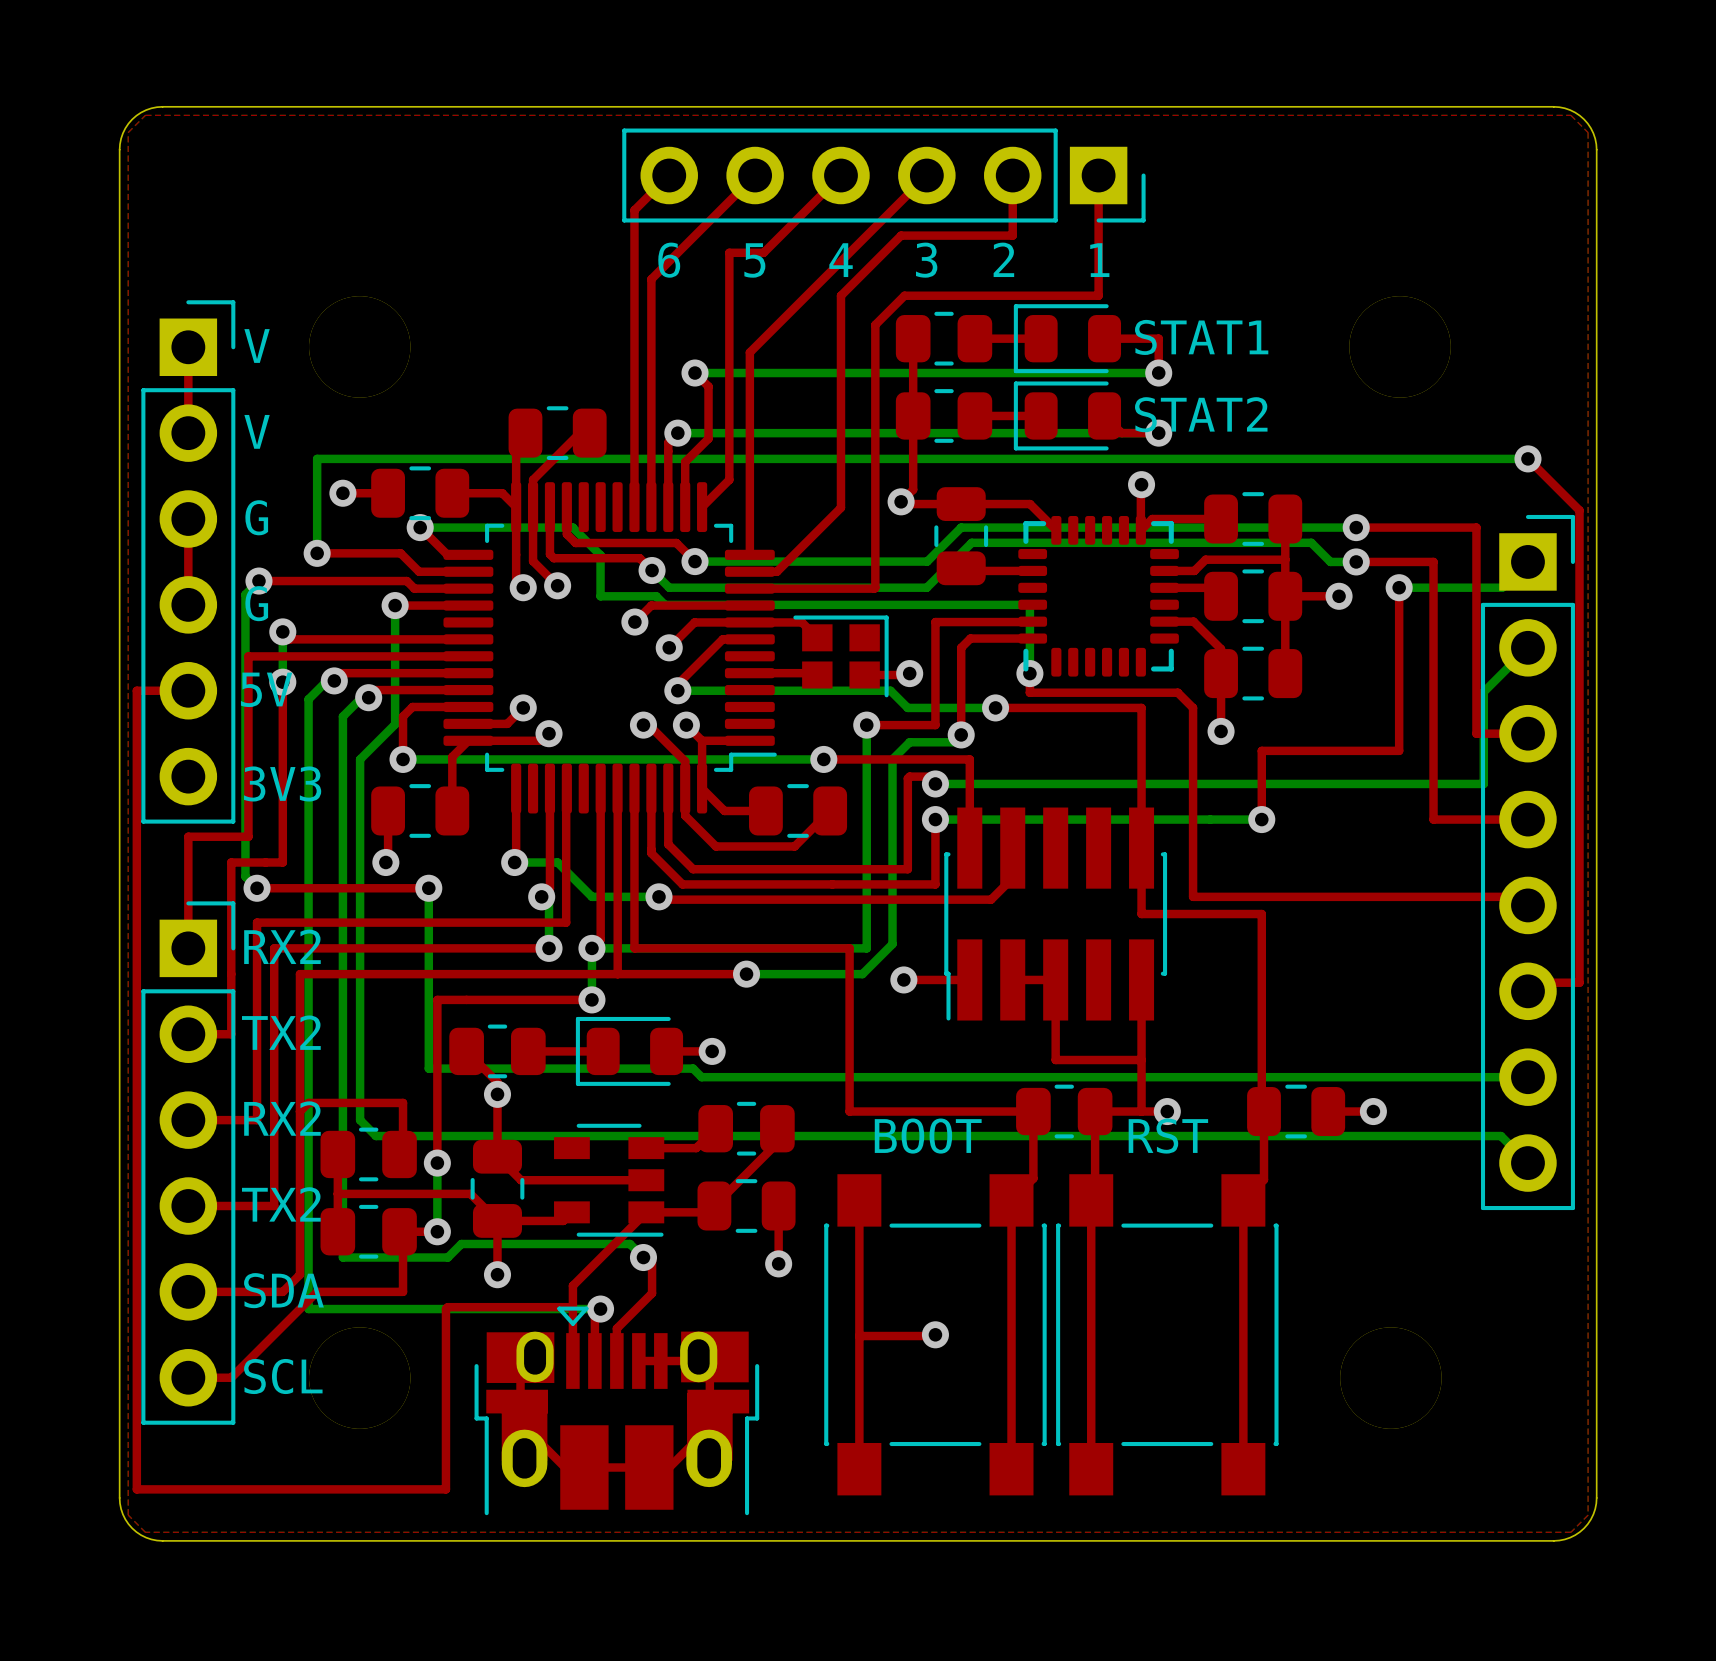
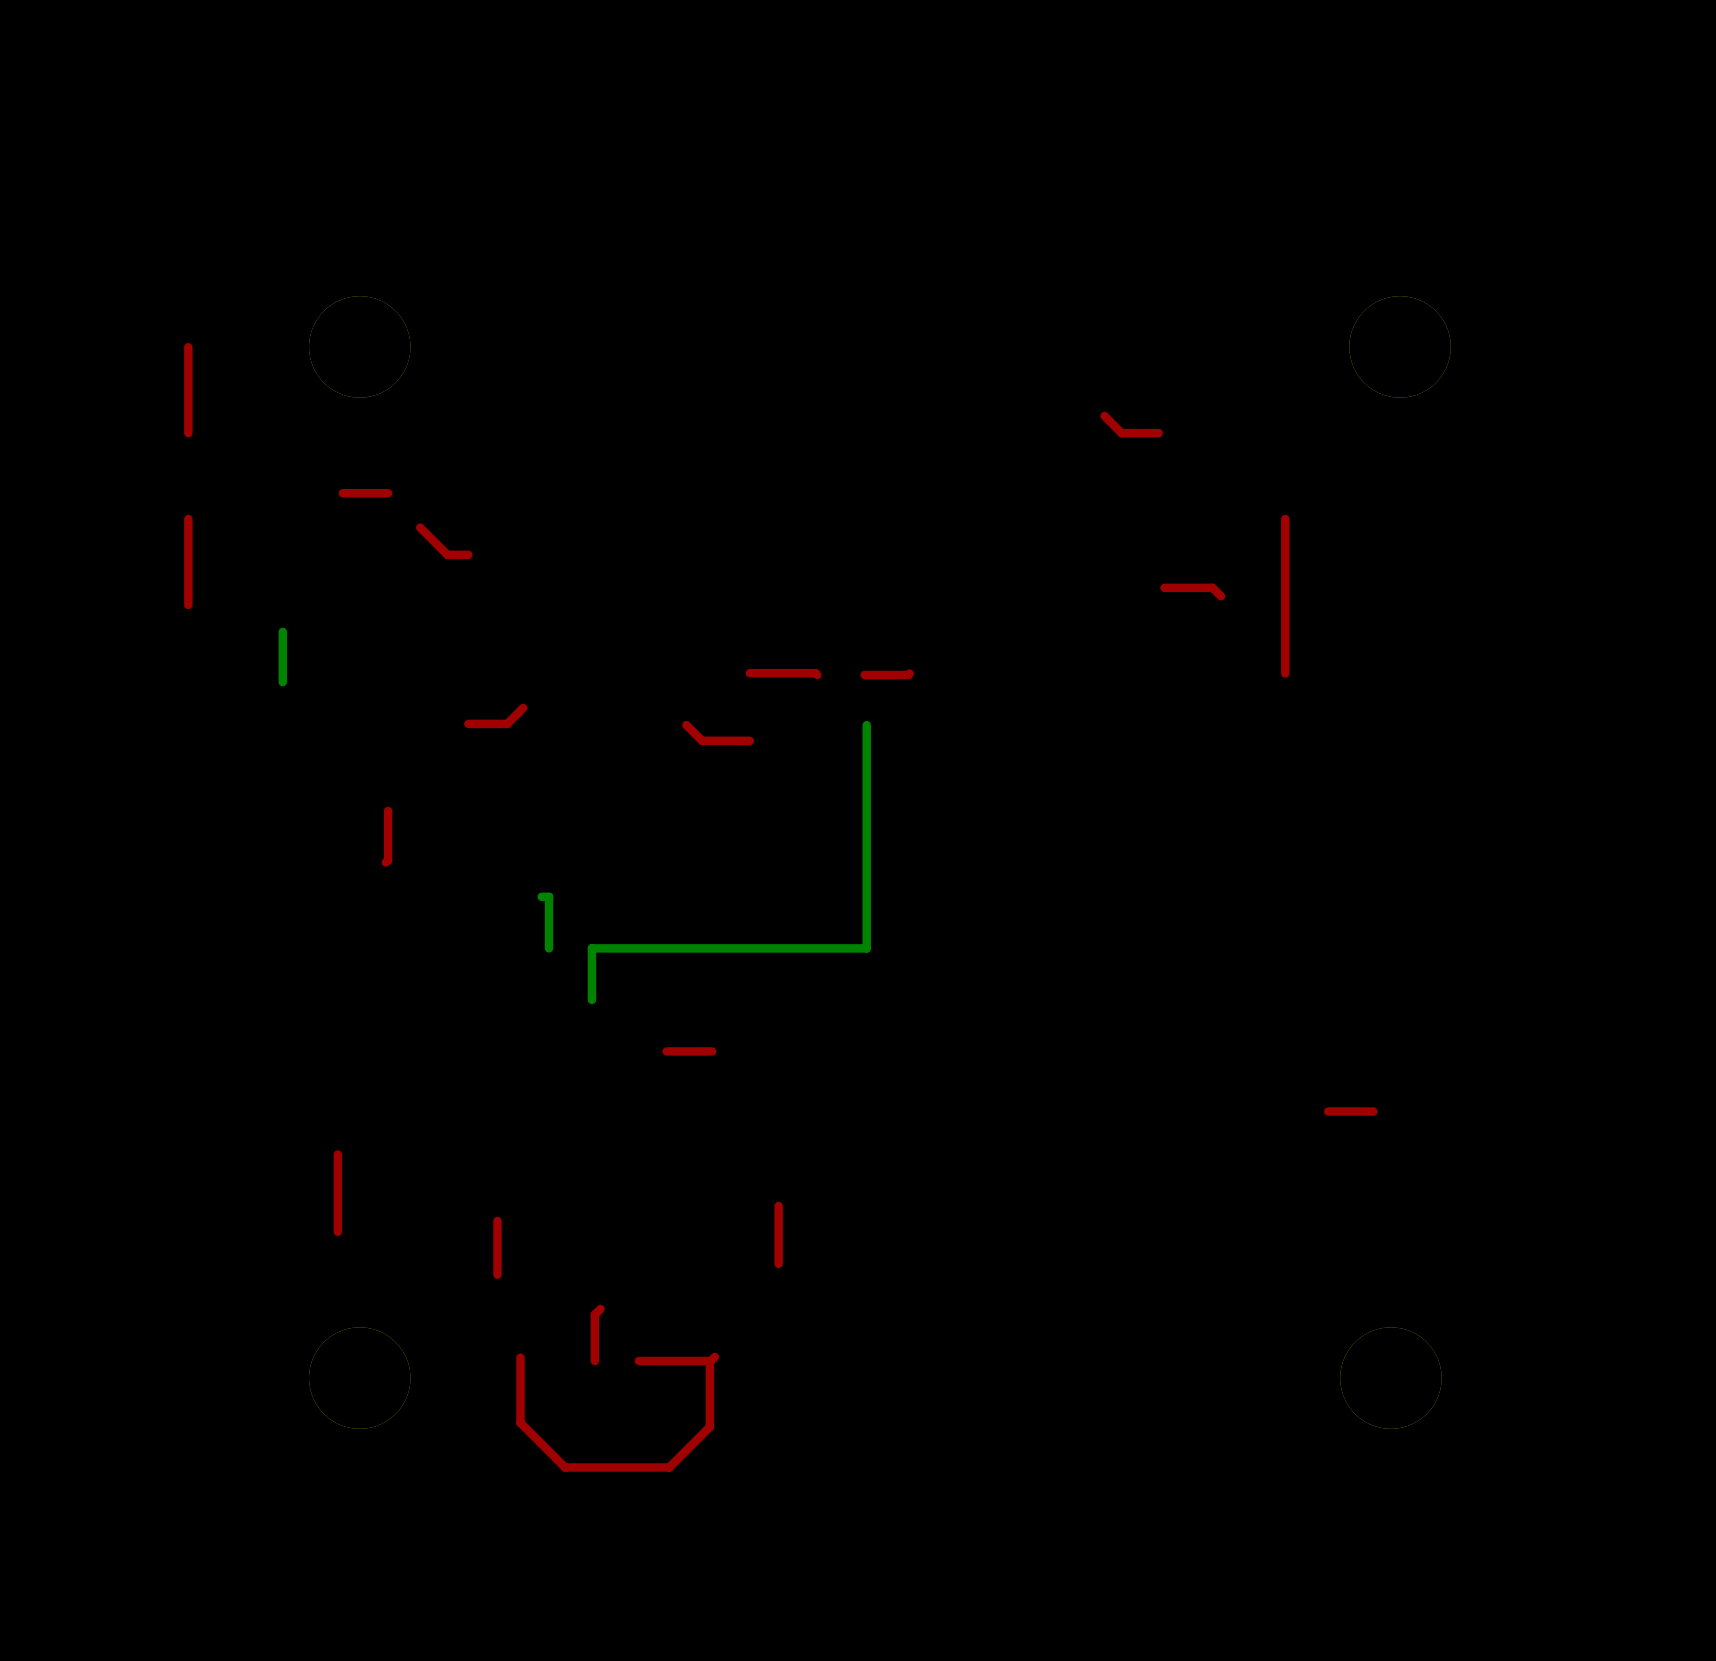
board edge: (162, 106) (1553, 106) (1570, 110) (1584, 119) (1593, 133) (1596, 149) (1596, 1497) (1593, 1514) (1584, 1528) (1570, 1537) (1553, 1540) (162, 1540) (146, 1537) (132, 1528) (122, 1514) (119, 1497) (119, 149) (122, 133) (132, 119) (146, 110) (162, 106) -> none
top zone outline: (145, 115) (128, 132) (128, 1515) (145, 1532) (1570, 1532) (1588, 1515) (1588, 132) (1570, 115) (145, 115) -> none
top track: (669, 175) (634, 210) (634, 507) -> none
top track: (755, 175) (651, 279) (651, 507) -> none
top track: (840, 175) (763, 252) (729, 252) (729, 479) (702, 507) -> none
part: (883, 175) -> none
top track: (926, 175) (749, 352) (749, 554) -> none
top track: (1012, 175) (1012, 235) (901, 235) (840, 295) (840, 507) (777, 571) (749, 571) -> none
top track: (1098, 175) (1098, 295) (904, 295) (875, 324) (875, 587) (749, 588) -> none
text: 2 (1003, 259) -> none
text: 6 (669, 260) -> none
text: 5 (754, 260) -> none
text: 4 (841, 260) -> none
text: 3 (926, 260) -> none
text: 1 (1099, 260) -> none
top track: (913, 338) (913, 489) (901, 501) (903, 504) (1030, 504) (1056, 530) -> none
part: (944, 338) -> none
top track: (974, 338) (1041, 338) -> none
part: STAT1 (1067, 338) -> none
top track: (1104, 338) (1158, 338) (1158, 373) -> none
text: V (257, 345) -> none
top track: (695, 373) (708, 386) (708, 438) (685, 462) (685, 507) -> none
bottom track: (695, 373) (1158, 373) -> none
via: (695, 373) -> none
via: (1158, 373) -> none
part: (944, 415) -> none
top track: (974, 415) (1041, 415) -> none
part: STAT2 (1067, 415) -> none
text: V (257, 431) -> none
top track: (525, 433) (516, 442) (516, 580) (523, 587) -> none
part: (557, 433) -> none
top track: (589, 433) (579, 433) (533, 479) (533, 561) (557, 585) -> none
top track: (677, 433) (668, 442) (668, 507) -> none
bottom track: (677, 433) (1158, 433) -> none
via: (677, 433) -> none
via: (1158, 433) -> none
top track: (1527, 458) (1579, 510) (1579, 982) (1536, 982) (1527, 991) -> none
bottom track: (1527, 458) (317, 458) (317, 553) -> none
via: (1527, 458) -> none
top track: (1141, 484) (1140, 530) (1152, 519) (1221, 519) -> none
via: (1141, 484) -> none
via: (342, 493) -> none
part: (420, 493) -> none
top track: (452, 493) (502, 493) (516, 507) -> none
via: (901, 501) -> none
top track: (549, 507) (549, 554) (553, 558) (639, 558) (652, 570) -> none
top track: (566, 507) (566, 534) (575, 543) (676, 543) (695, 561) -> none
text: G (256, 517) -> none
part: (1253, 519) -> none
bottom track: (420, 527) (572, 527) (600, 555) (600, 596) (656, 596) (664, 604) (1029, 604) (1029, 673) -> none
via: (420, 527) -> none
top track: (1356, 527) (1476, 527) (1476, 733) (1527, 733) -> none
bottom track: (1356, 527) (961, 527) (927, 561) (695, 561) -> none
via: (1356, 527) -> none
part: (961, 536) -> none
top track: (317, 553) (400, 553) (419, 571) (468, 571) -> none
via: (317, 553) -> none
top track: (1285, 559) (1205, 559) (1194, 570) (1164, 570) -> none
part: (188, 561) -> none
via: (695, 561) -> none
top track: (1356, 561) (1433, 561) (1433, 819) (1527, 819) -> none
bottom track: (1356, 561) (1330, 561) (1311, 542) (971, 542) (926, 587) (669, 587) (652, 570) -> none
via: (1356, 561) -> none
bottom track: (1527, 561) (1502, 587) (1399, 587) -> none
top track: (961, 568) (963, 570) (1032, 570) -> none
via: (652, 570) -> none
top track: (258, 581) (406, 581) (414, 588) (468, 588) -> none
bottom track: (258, 581) (245, 594) (245, 876) (257, 888) -> none
via: (258, 581) -> none
via: (557, 585) -> none
via: (523, 587) -> none
top track: (1399, 587) (1399, 750) (1261, 750) (1261, 819) -> none
via: (1399, 587) -> none
part: (1098, 596) -> none
part: (1253, 596) -> none
top track: (1285, 596) (1339, 596) -> none
via: (1339, 596) -> none
text: G (256, 603) -> none
top track: (395, 605) (468, 605) -> none
bottom track: (395, 605) (395, 724) (360, 759) (360, 1120) (376, 1136) (1500, 1136) (1527, 1163) -> none
via: (395, 605) -> none
top track: (749, 605) (651, 605) (634, 622) -> none
top track: (1164, 621) (1193, 621) (1221, 649) (1221, 731) -> none
via: (634, 622) -> none
top track: (1032, 622) (935, 622) (935, 725) (866, 725) -> none
top track: (282, 631) (290, 639) (468, 639) -> none
via: (282, 631) -> none
top track: (817, 637) (801, 622) (694, 622) (669, 647) -> none
top track: (1032, 638) (970, 638) (961, 647) (961, 734) -> none
top track: (749, 639) (722, 639) (677, 684) (677, 690) -> none
part: (610, 647) -> none
via: (669, 647) -> none
bottom track: (1527, 647) (1483, 692) (1483, 783) (935, 783) -> none
top track: (468, 656) (248, 656) (248, 836) (188, 836) (188, 948) -> none
part: (840, 656) -> none
top track: (468, 673) (342, 673) (334, 680) -> none
via: (909, 673) -> none
top track: (1029, 673) (1029, 692) (1177, 692) (1193, 707) (1193, 896) (1519, 896) (1527, 905) -> none
via: (1029, 673) -> none
part: (1253, 673) -> none
bottom track: (334, 680) (334, 673) (308, 699) (308, 1309) (600, 1309) -> none
via: (334, 680) -> none
top track: (282, 682) (282, 862) (231, 862) (231, 1034) (188, 1034) -> none
via: (282, 682) -> none
text: 5V (266, 689) -> none
top track: (188, 690) (136, 690) (136, 1489) (445, 1489) (445, 1309) (447, 1307) (572, 1307) -> none
top track: (468, 690) (376, 690) (368, 697) -> none
bottom track: (677, 690) (890, 690) (907, 707) (995, 707) -> none
via: (677, 690) -> none
bottom track: (368, 697) (368, 690) (342, 716) (342, 1257) (447, 1257) (461, 1244) (629, 1244) (643, 1257) -> none
via: (368, 697) -> none
top track: (468, 706) (412, 706) (403, 716) (403, 759) -> none
via: (523, 707) -> none
top track: (995, 707) (1141, 707) (1141, 914) (1261, 914) (1261, 1109) (1264, 1111) (1264, 1179) (1243, 1200) (1243, 1469) -> none
via: (995, 707) -> none
top track: (643, 725) (648, 725) (685, 761) (685, 815) (715, 846) (794, 846) (830, 810) -> none
via: (643, 725) -> none
via: (686, 725) -> none
via: (866, 725) -> none
via: (1221, 731) -> none
top track: (549, 733) (541, 740) (468, 740) (452, 756) (452, 810) -> none
via: (549, 733) -> none
bottom track: (961, 734) (961, 742) (909, 742) (892, 759) (892, 944) (862, 974) (746, 974) -> none
via: (961, 734) -> none
top track: (702, 740) (702, 788) (724, 810) (765, 810) -> none
bottom track: (403, 759) (823, 759) -> none
via: (403, 759) -> none
top track: (823, 759) (969, 759) (969, 848) -> none
via: (823, 759) -> none
text: 3V3 (282, 783) -> none
top track: (935, 783) (935, 776) (909, 776) (907, 778) (907, 869) (693, 869) (668, 844) (668, 788) -> none
via: (935, 783) -> none
top track: (516, 788) (514, 862) -> none
top track: (549, 788) (549, 888) (541, 896) -> none
top track: (566, 788) (566, 922) (257, 922) (257, 1120) (188, 1120) -> none
top track: (600, 788) (600, 939) (591, 948) -> none
top track: (617, 788) (617, 974) -> none
top track: (634, 788) (634, 947) -> none
top track: (651, 788) (651, 853) (682, 884) (935, 884) (935, 819) -> none
part: (420, 810) -> none
part: (798, 810) -> none
bottom track: (935, 819) (1261, 819) -> none
via: (935, 819) -> none
via: (1261, 819) -> none
top track: (1012, 848) (1012, 878) (991, 899) (661, 899) (658, 896) -> none
via: (385, 862) -> none
bottom track: (514, 862) (557, 862) (591, 896) (658, 896) -> none
via: (514, 862) -> none
part: (1527, 862) -> none
top track: (257, 888) (428, 888) -> none
via: (257, 888) -> none
bottom track: (428, 888) (428, 1068) (693, 1068) (701, 1077) (1527, 1077) -> none
via: (428, 888) -> none
via: (541, 896) -> none
via: (658, 896) -> none
part: (1055, 914) -> none
text: RX2 (282, 946) -> none
top track: (549, 948) (274, 948) (274, 1206) (188, 1206) -> none
via: (549, 948) -> none
via: (591, 948) -> none
top track: (634, 948) (849, 948) (849, 1111) (1033, 1111) (1033, 1178) (1011, 1200) (1011, 1469) -> none
top track: (746, 974) (299, 974) (299, 1274) (282, 1291) (188, 1291) -> none
via: (746, 974) -> none
top track: (903, 979) (969, 979) -> none
via: (903, 979) -> none
top track: (1012, 979) (1055, 979) (1055, 1060) (1141, 1060) -> none
top track: (1141, 979) (1141, 1111) -> none
top track: (591, 999) (437, 999) (437, 1163) -> none
via: (591, 999) -> none
text: TX2 (281, 1032) -> none
top track: (466, 1051) (497, 1082) (497, 1156) (521, 1180) (646, 1180) -> none
part: (497, 1051) -> none
top track: (528, 1051) (603, 1051) -> none
part: (629, 1051) -> none
via: (712, 1051) -> none
via: (497, 1094) -> none
top track: (299, 1111) (308, 1102) (403, 1102) (403, 1150) (399, 1154) -> none
part: (1064, 1111) -> none
top track: (1167, 1111) (1095, 1111) (1095, 1196) (1091, 1200) (1091, 1469) -> none
via: (1167, 1111) -> none
part: (1296, 1111) -> none
via: (1373, 1111) -> none
text: RX2 (282, 1118) -> none
top track: (715, 1128) (696, 1148) (646, 1148) -> none
part: (746, 1128) -> none
top track: (777, 1128) (777, 1143) (708, 1212) (646, 1212) (572, 1285) (572, 1361) -> none
part: (368, 1154) -> none
part: (188, 1163) -> none
bottom track: (437, 1163) (437, 1231) -> none
via: (437, 1163) -> none
part: (609, 1180) -> none
part: (497, 1188) -> none
top track: (337, 1193) (470, 1193) (497, 1220) (563, 1220) (571, 1212) -> none
top track: (859, 1200) (859, 1469) -> none
text: TX2 (281, 1204) -> none
part: (746, 1206) -> none
part: (368, 1231) -> none
top track: (437, 1231) (399, 1231) (403, 1235) (403, 1291) (317, 1291) (231, 1377) (188, 1377) -> none
via: (437, 1231) -> none
top track: (643, 1257) (652, 1257) (652, 1293) (616, 1328) (616, 1361) -> none
via: (643, 1257) -> none
via: (778, 1263) -> none
via: (497, 1274) -> none
text: SDA (283, 1290) -> none
via: (600, 1309) -> none
top track: (935, 1334) (859, 1336) -> none
part: BOOT (935, 1334) -> none
via: (935, 1334) -> none
part: RST (1167, 1334) -> none
text: SCL (283, 1376) -> none
part: (616, 1410) -> none

